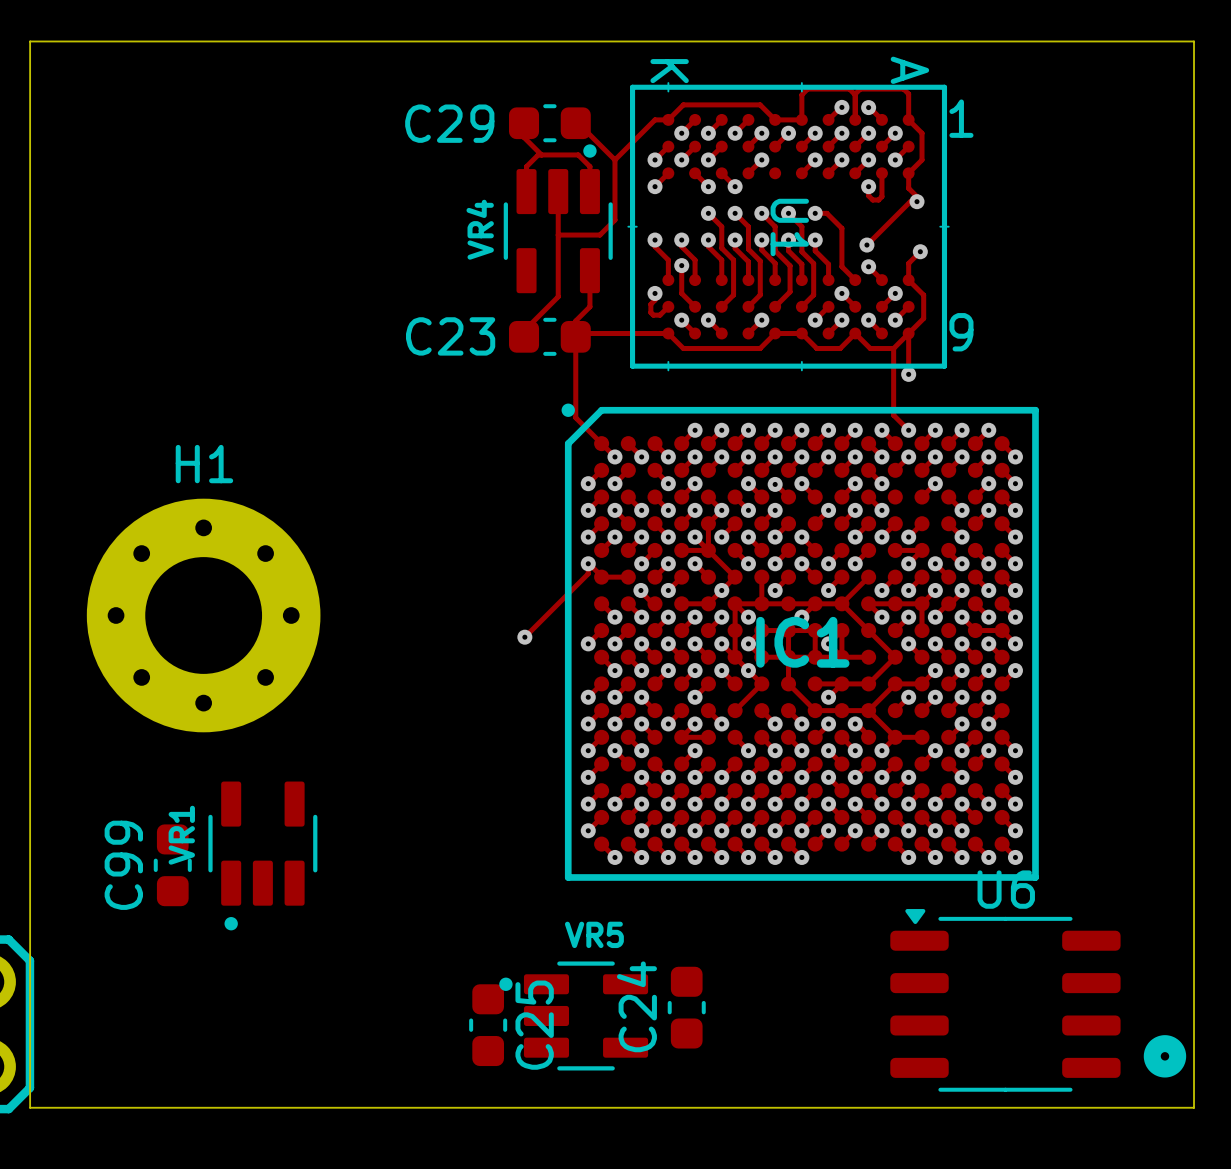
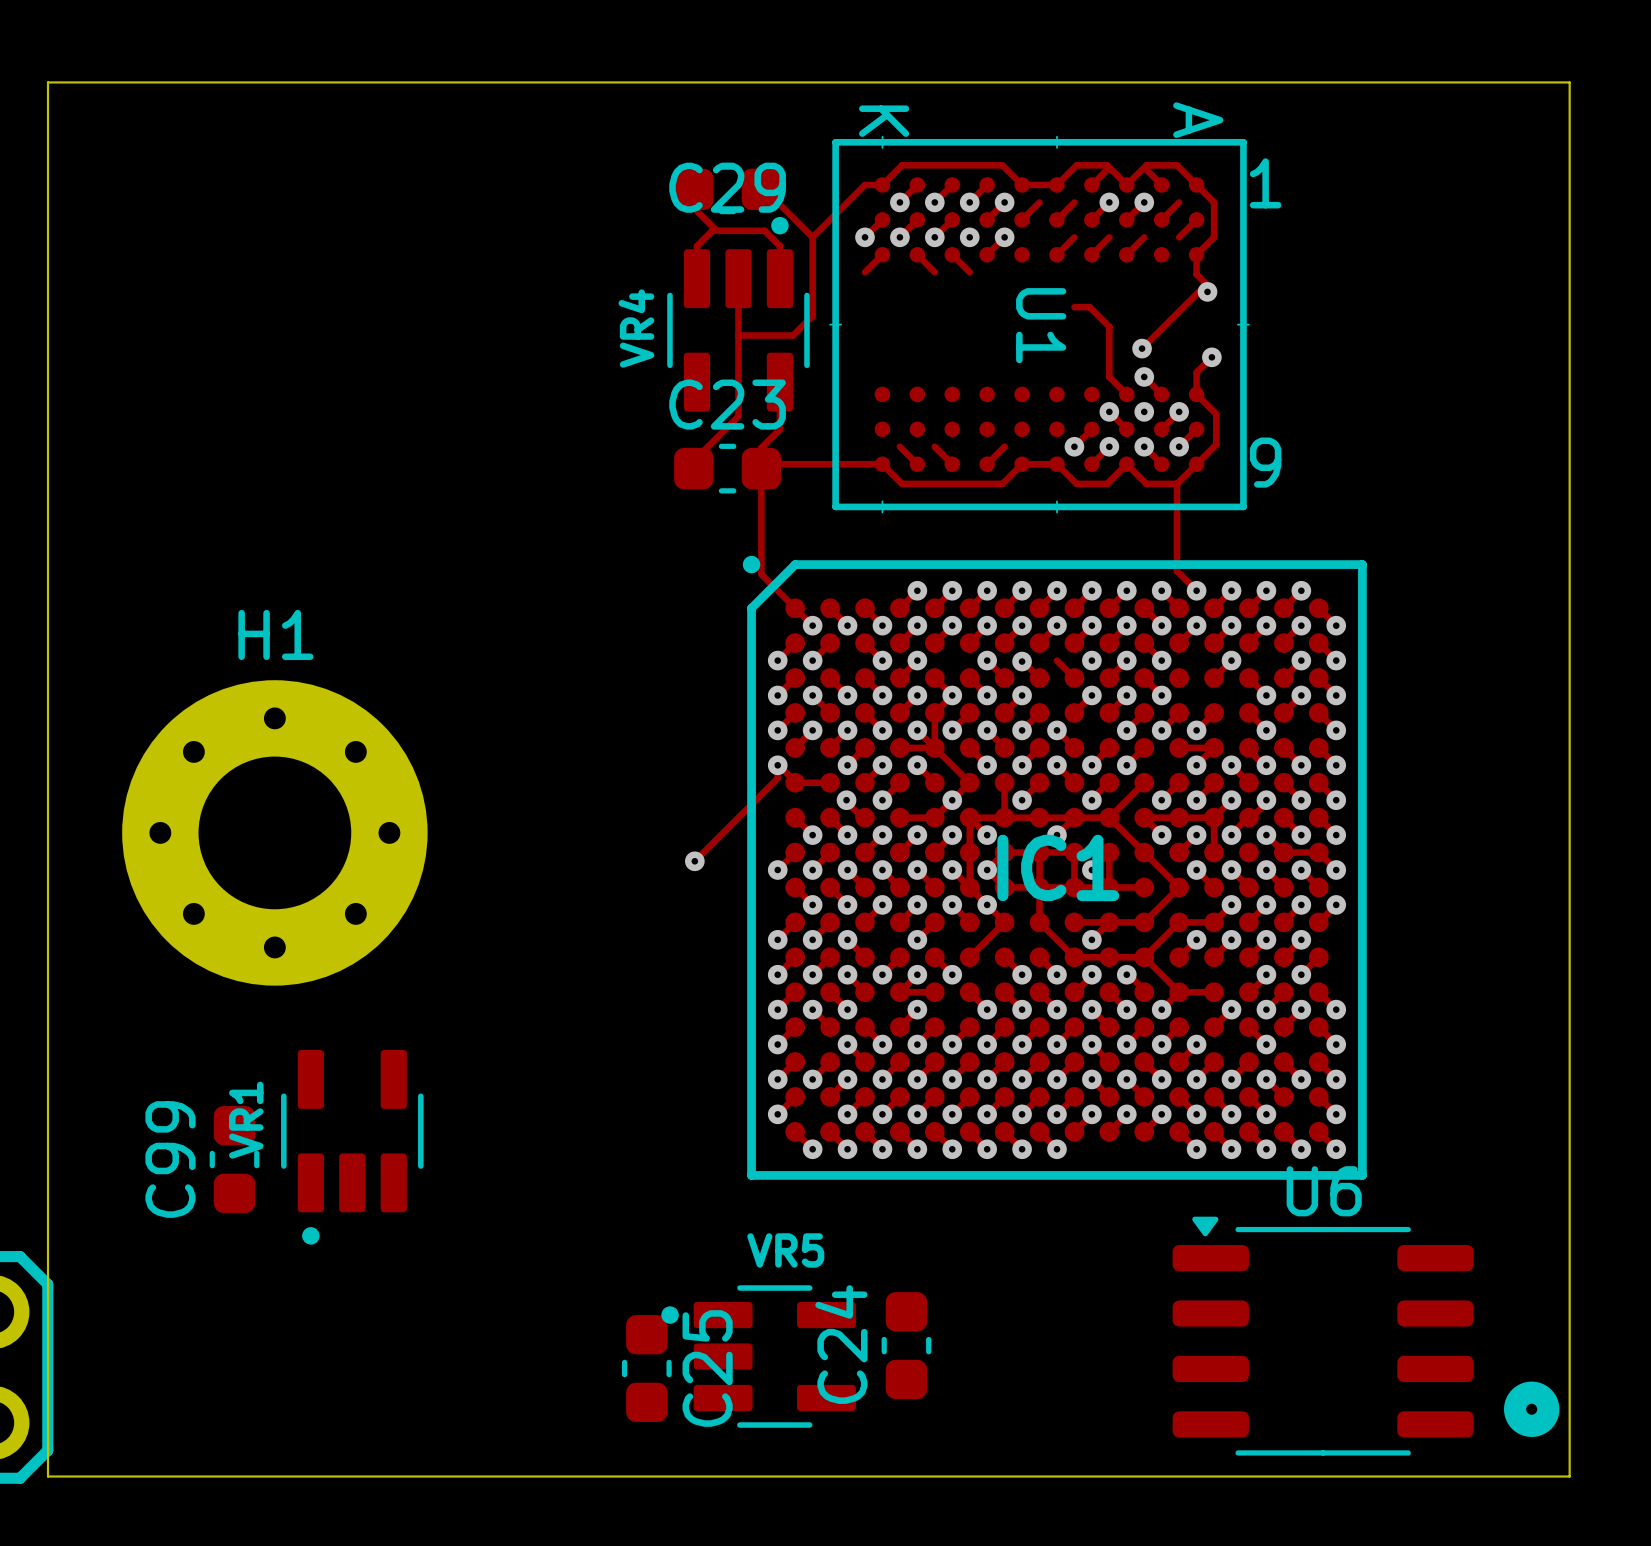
track: (855, 94) (849, 89) (807, 89) (801, 94) (801, 119) -> none
via: (841, 107) -> none
via: (868, 107) -> none
track: (855, 119) (855, 94) (860, 89) (903, 89) (908, 94) (908, 119) -> (1056, 184) (1076, 165) (1107, 165) (1126, 184) (1146, 165) (1176, 165) (1196, 184)
C29 name position: C29 (449, 123) -> C29 (727, 187)
via: (788, 133) -> none
via: (815, 133) -> none
via: (895, 133) -> none
via: none -> (969, 237)
via: (815, 159) -> none
via: (841, 159) -> none
via: (868, 159) -> none
via: (895, 159) -> none
track: (881, 173) (881, 196) (878, 200) (872, 200) (868, 195) (868, 186) -> none
via: (655, 186) -> none
via: (708, 186) -> none
via: (735, 186) -> none
via: (868, 186) -> none
track: (708, 213) (721, 226) (721, 248) (733, 260) (733, 294) (721, 306) -> none
via: (708, 213) -> none
track: (735, 213) (748, 226) (748, 249) (760, 261) (760, 294) (748, 306) -> none
via: (735, 213) -> none
track: (761, 213) (775, 226) (775, 250) (790, 265) (790, 291) (775, 306) -> none
via: (761, 213) -> none
track: (788, 213) (801, 226) (801, 251) (813, 263) (813, 294) (801, 306) -> none
via: (788, 213) -> none
via: (815, 213) -> none
track: (655, 240) (655, 246) (668, 260) (668, 280) -> none
via: (655, 240) -> none
track: (681, 240) (681, 246) (695, 260) (695, 280) -> none
via: (681, 240) -> none
track: (708, 240) (708, 246) (721, 260) (721, 280) -> none
via: (708, 240) -> none
track: (735, 240) (735, 248) (748, 261) (748, 280) -> none
via: (735, 240) -> none
track: (761, 240) (761, 250) (775, 263) (775, 280) -> none
via: (761, 240) -> none
track: (788, 240) (788, 250) (801, 264) (801, 280) -> none
via: (788, 240) -> none
track: (815, 240) (815, 250) (828, 264) (828, 280) -> none
via: (815, 240) -> none
track: (681, 265) (681, 293) (695, 306) -> none
via: (681, 265) -> none
track: (655, 293) (655, 300) (650, 304) (650, 312) (653, 315) (660, 315) (668, 306) -> none
via: (655, 293) -> none
via: none -> (1144, 411)
via: (681, 320) -> none
via: (708, 320) -> none
via: (761, 320) -> none
track: (908, 333) (908, 374) -> none
C23 name position: C23 (450, 336) -> C23 (727, 404)
via: (908, 374) -> none
via position: (801, 483) -> (1091, 660)

